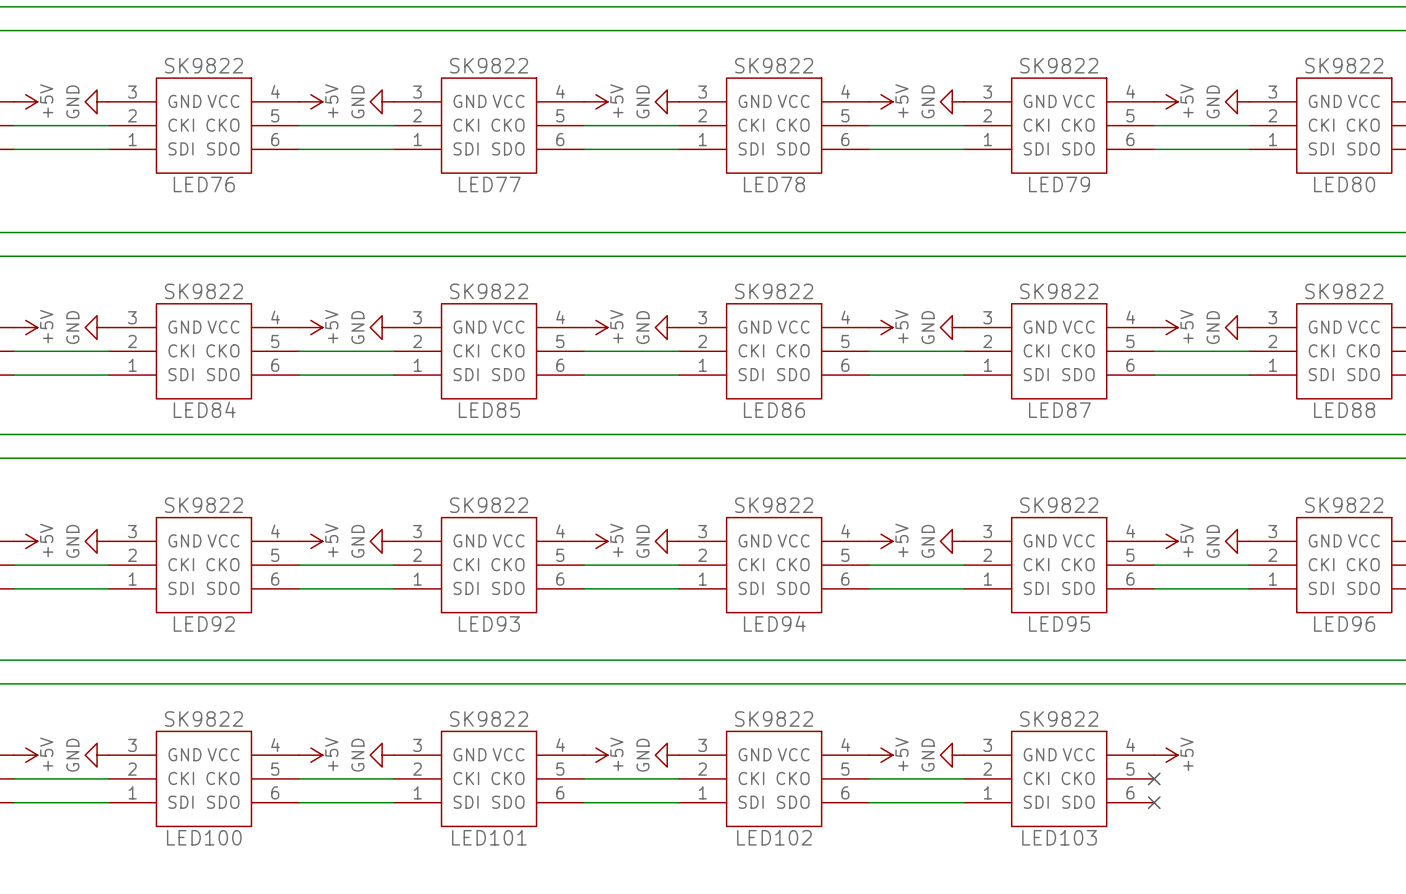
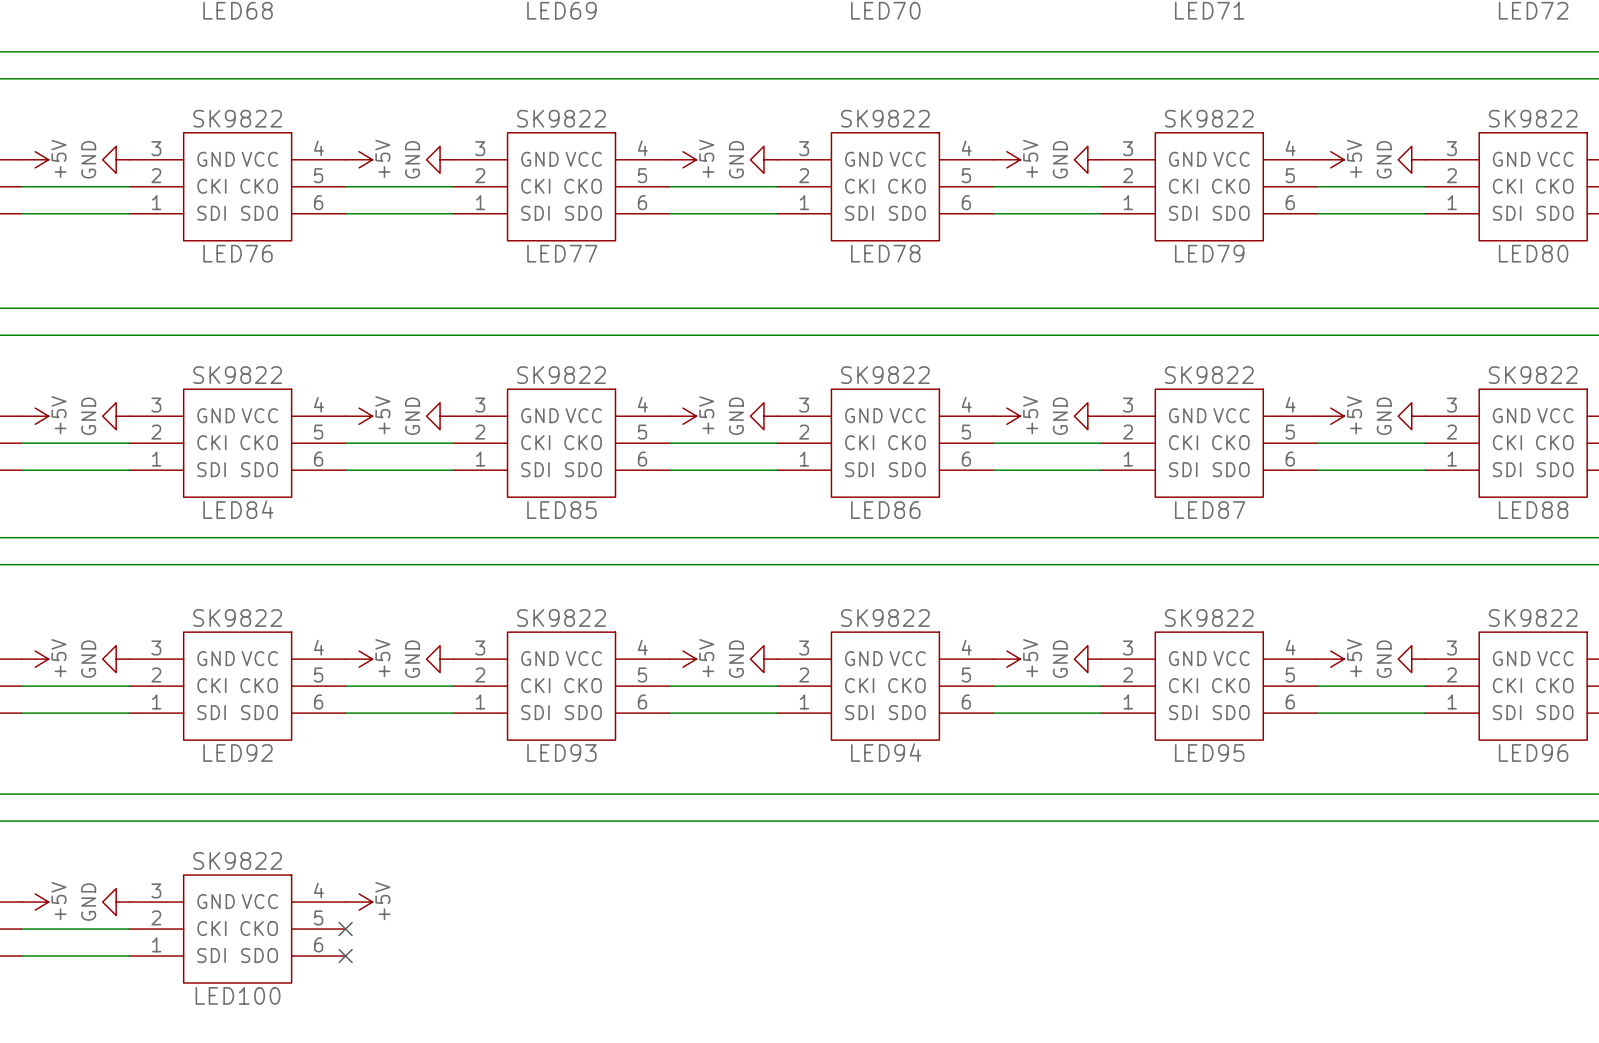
power symbol: GND (382, 755) -> none
power symbol: +5V (595, 755) -> none
power symbol: GND (667, 755) -> none
power symbol: +5V (881, 755) -> none
power symbol: GND (952, 755) -> none
power symbol: +5V (1166, 755) -> none
wire: (298, 778) (394, 778) -> none
no-connect mark: none -> (345, 929)
LED101: SK9822 (489, 778) -> none
wire: (584, 778) (679, 778) -> none
LED102: SK9822 (774, 778) -> none
wire: (869, 778) (964, 778) -> none
LED103: SK9822 (1059, 778) -> none
no-connect mark: (1154, 778) -> none
wire: (298, 802) (394, 802) -> none
no-connect mark: none -> (345, 956)
wire: (584, 802) (679, 802) -> none
wire: (869, 802) (964, 802) -> none
no-connect mark: (1154, 802) -> none

